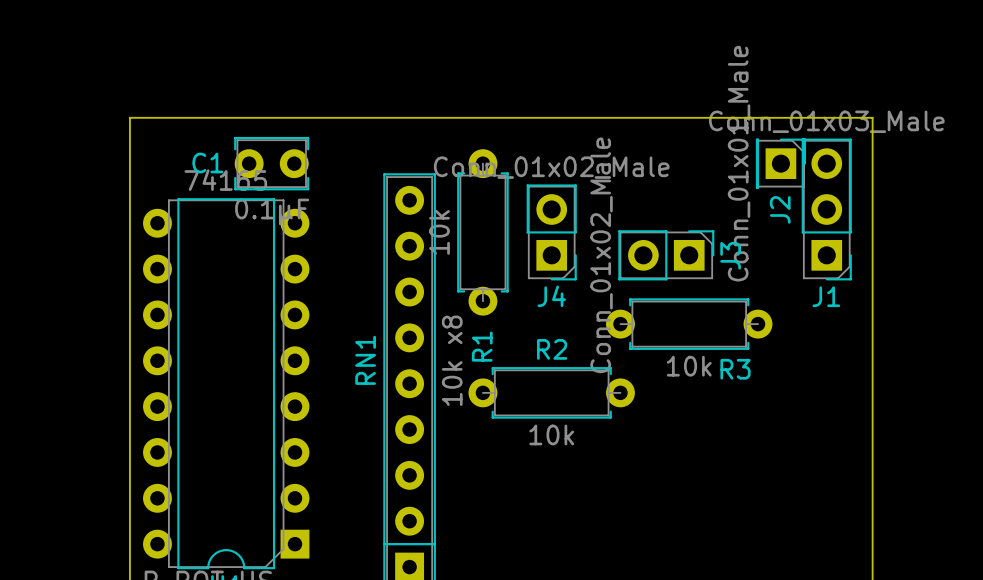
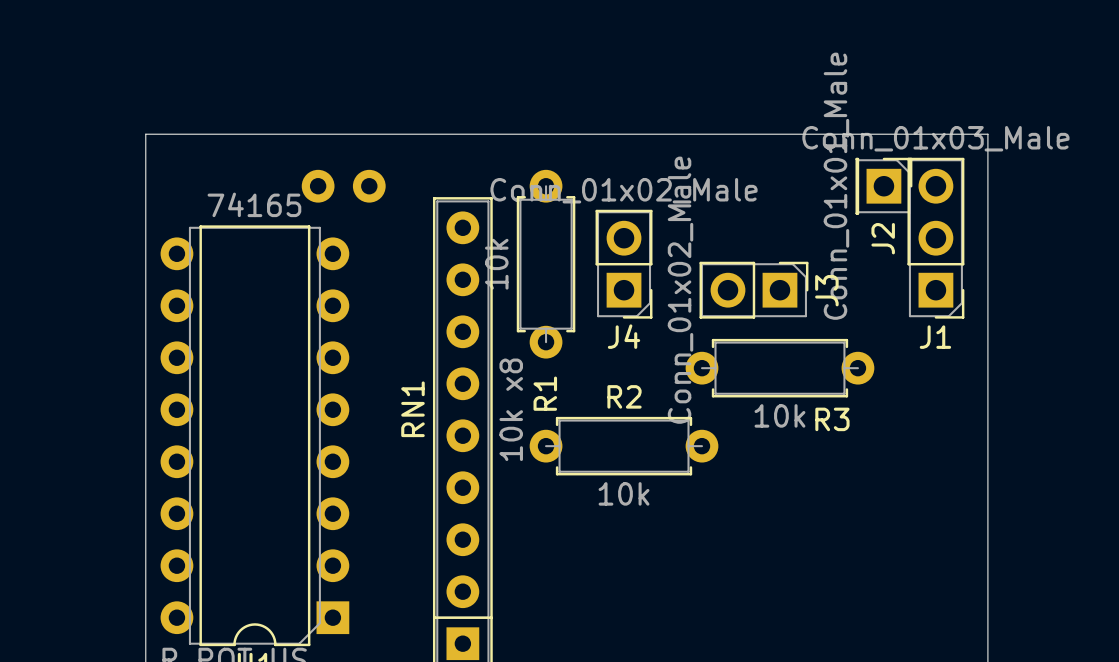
C1 side: top (271, 163) -> bottom (343, 186)

